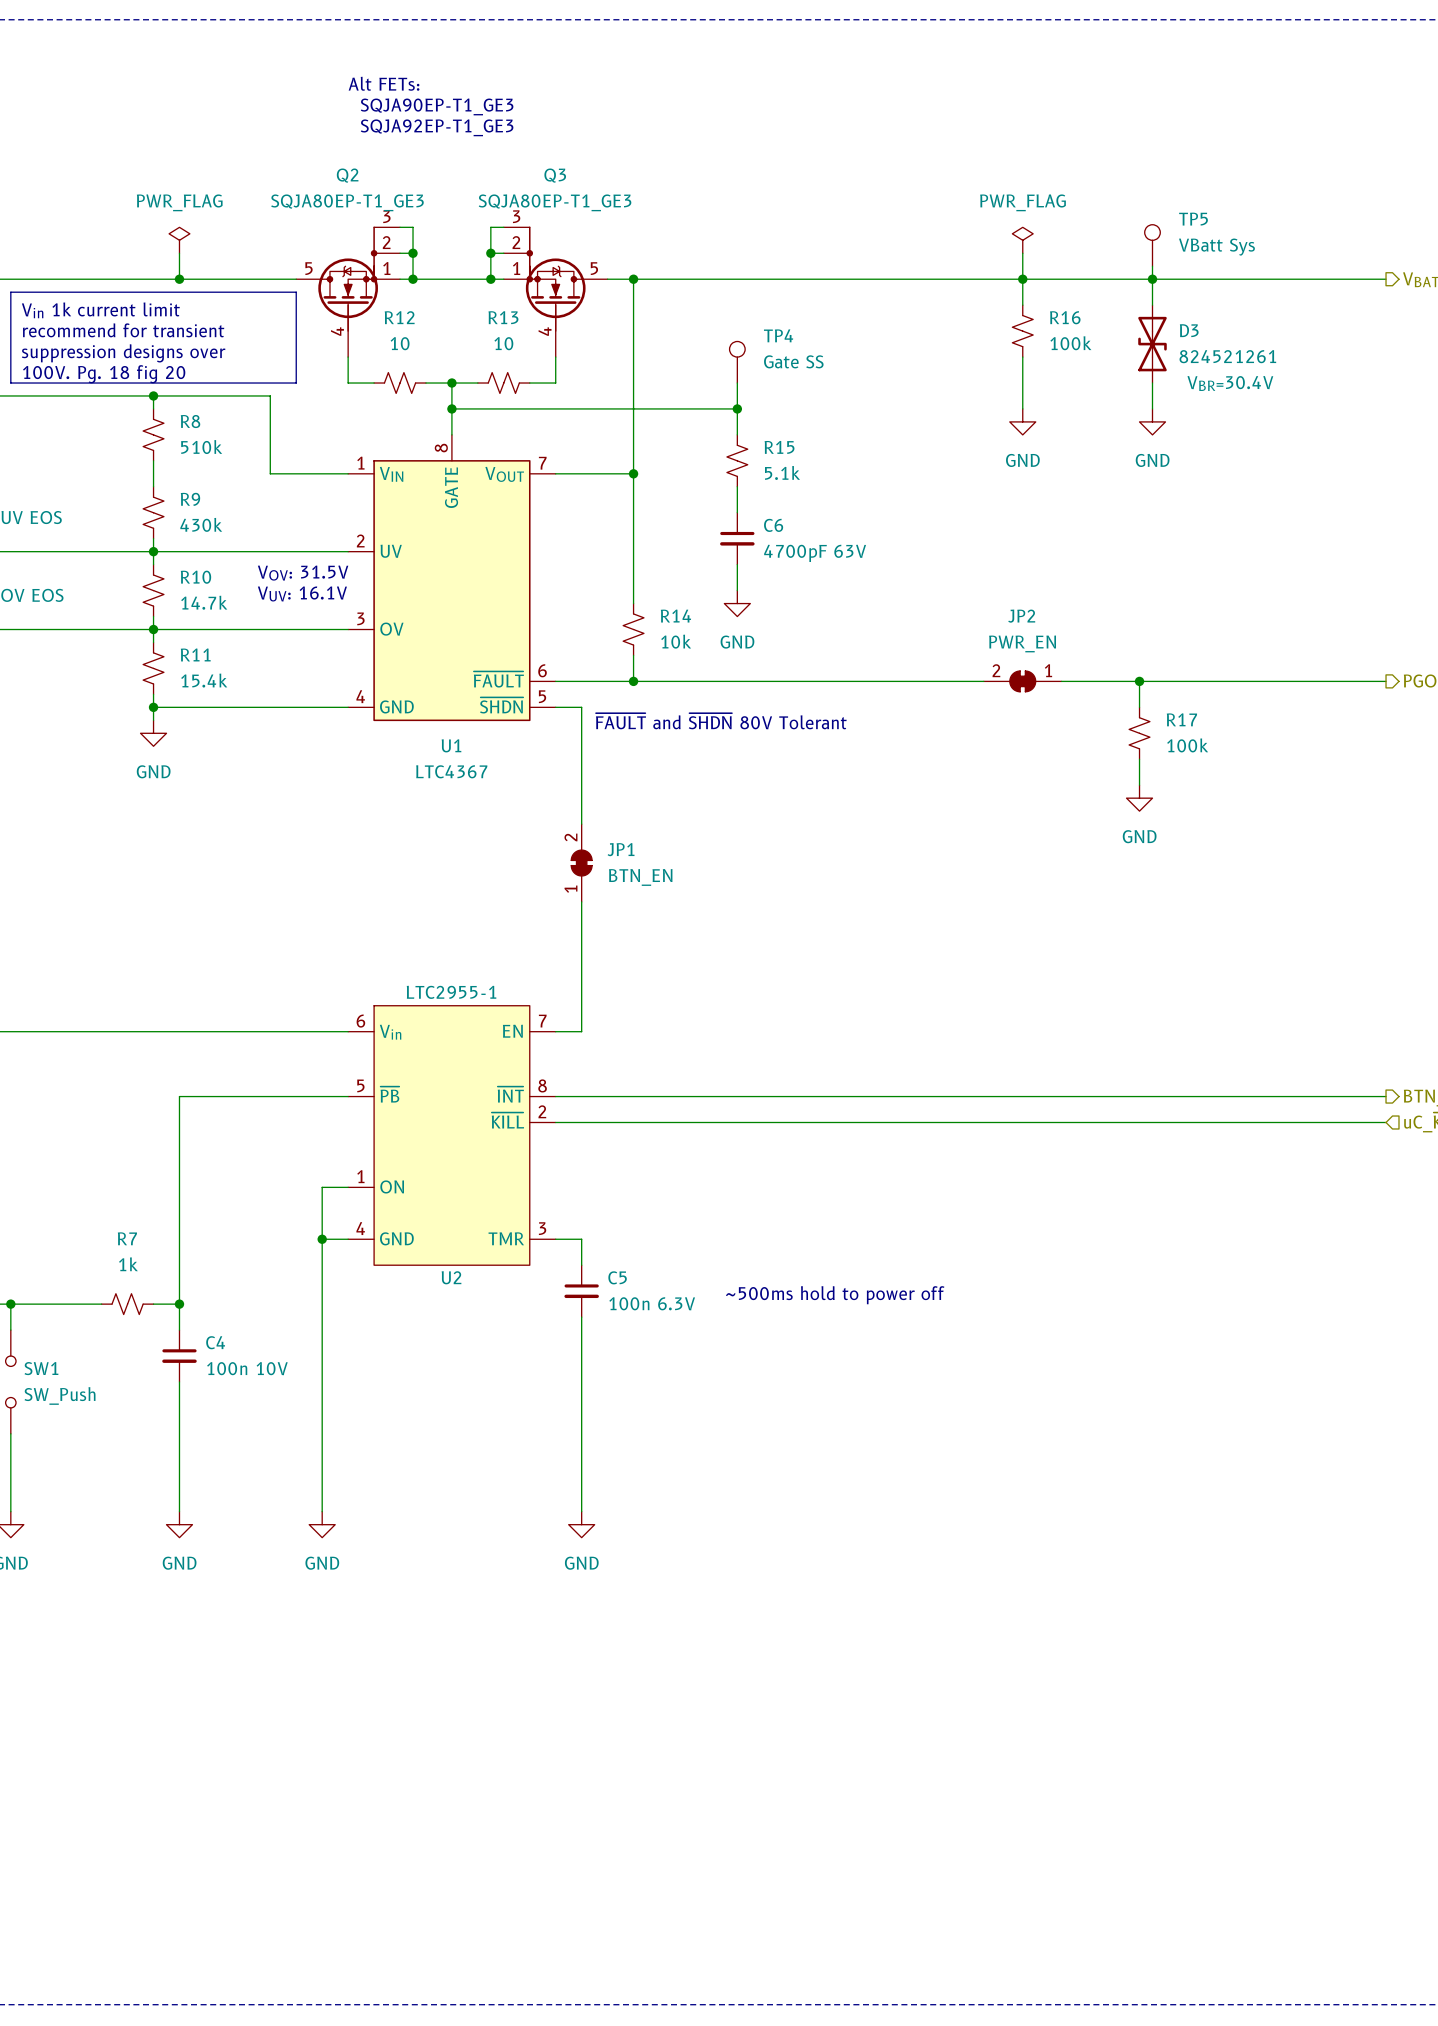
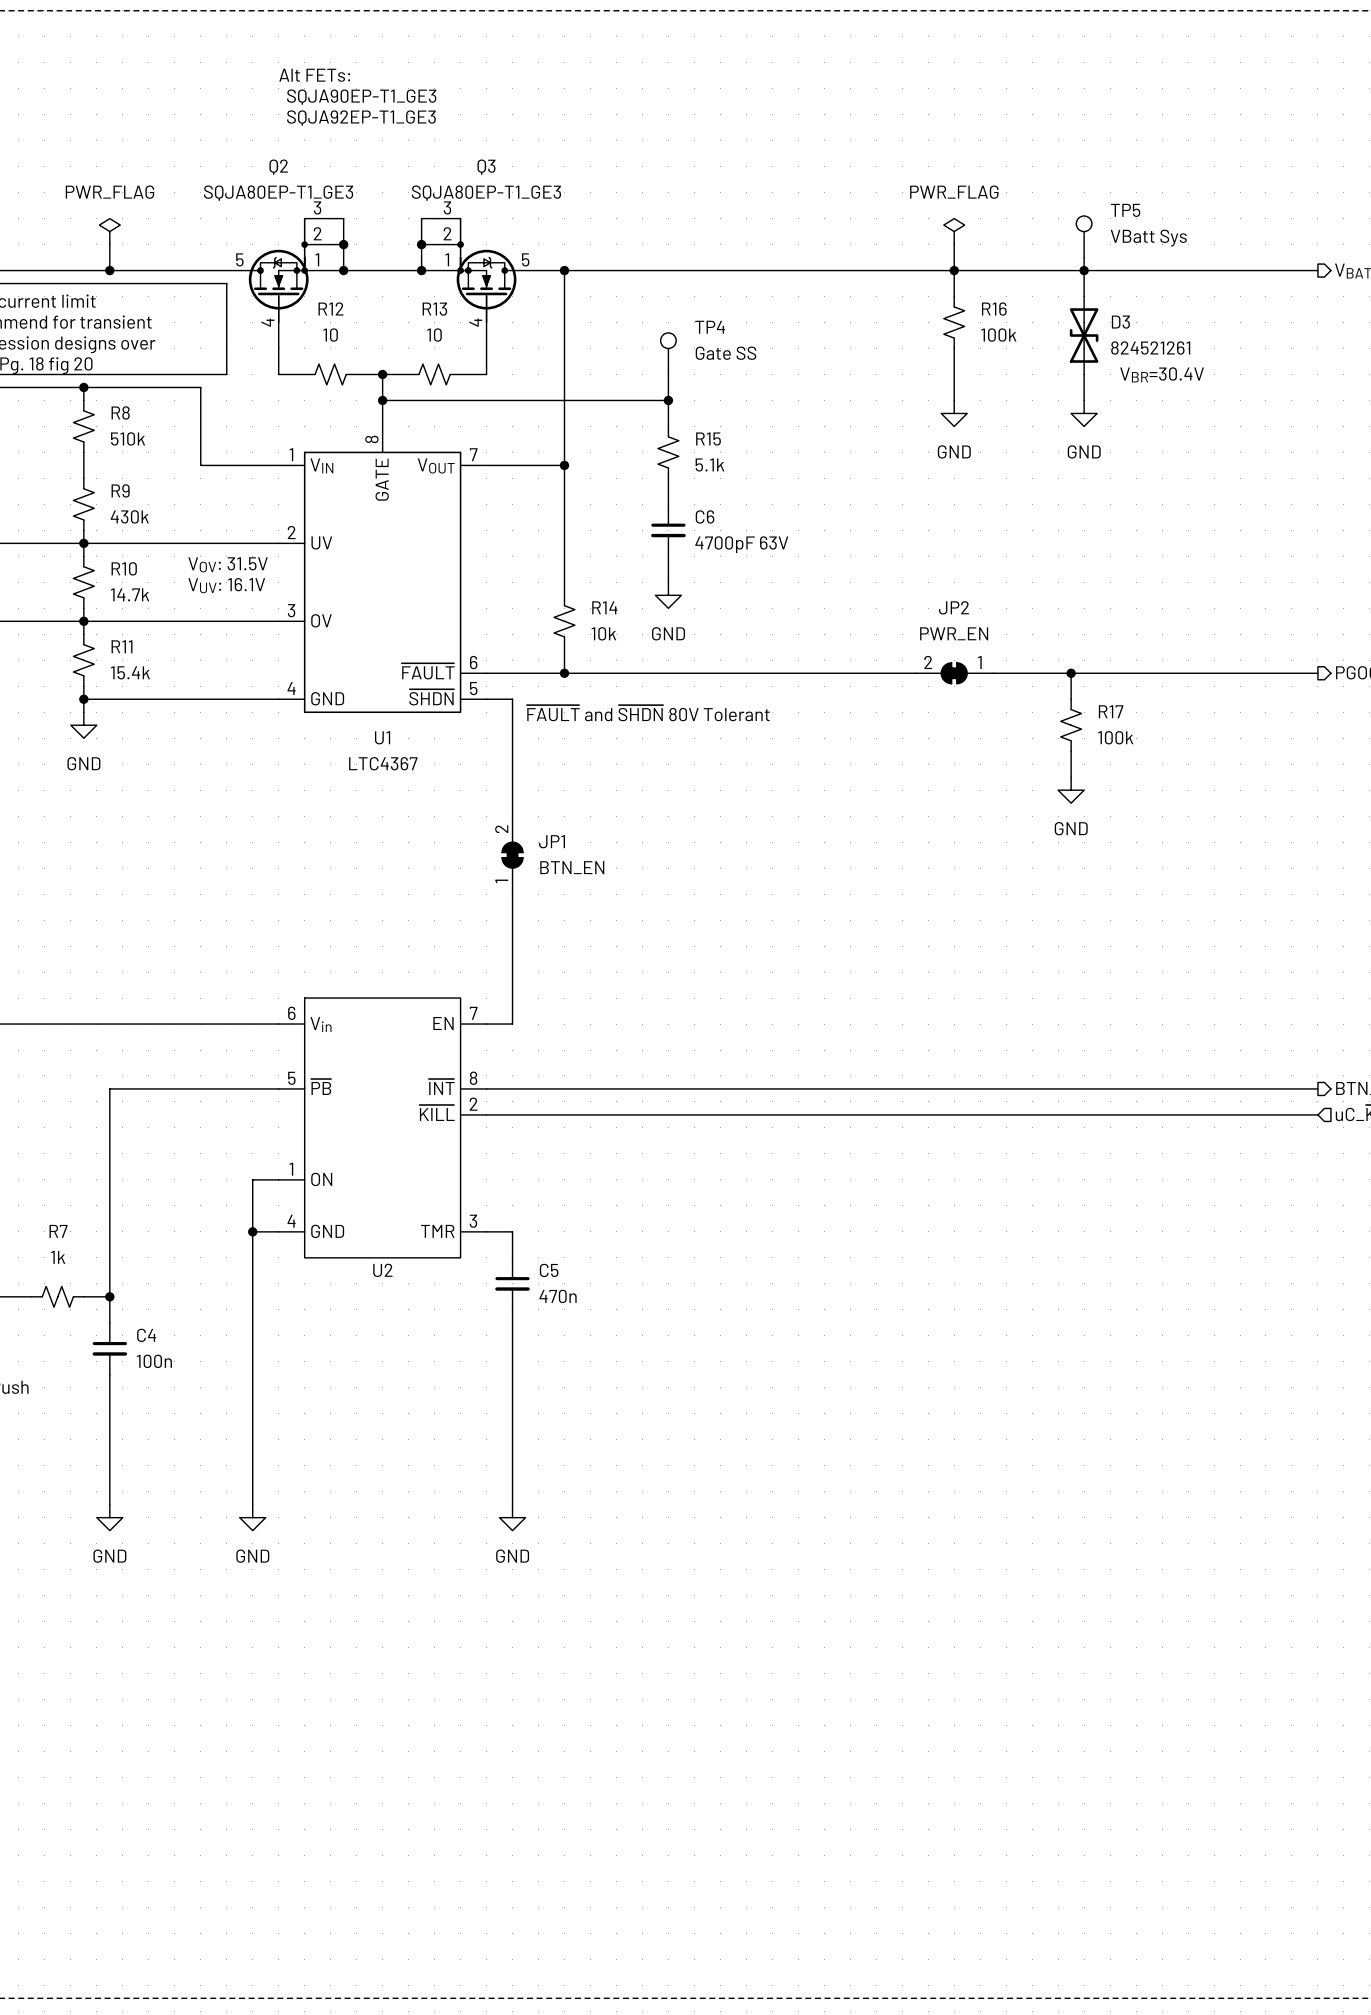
U2 value: LTC2955-1 (451, 992) -> none
text: ~500ms hold to power off (835, 1295) -> none
C5 value: 100n 6.3V (652, 1303) -> 470n (558, 1296)
C4 value: 100n 10V (247, 1368) -> 100n (154, 1361)

